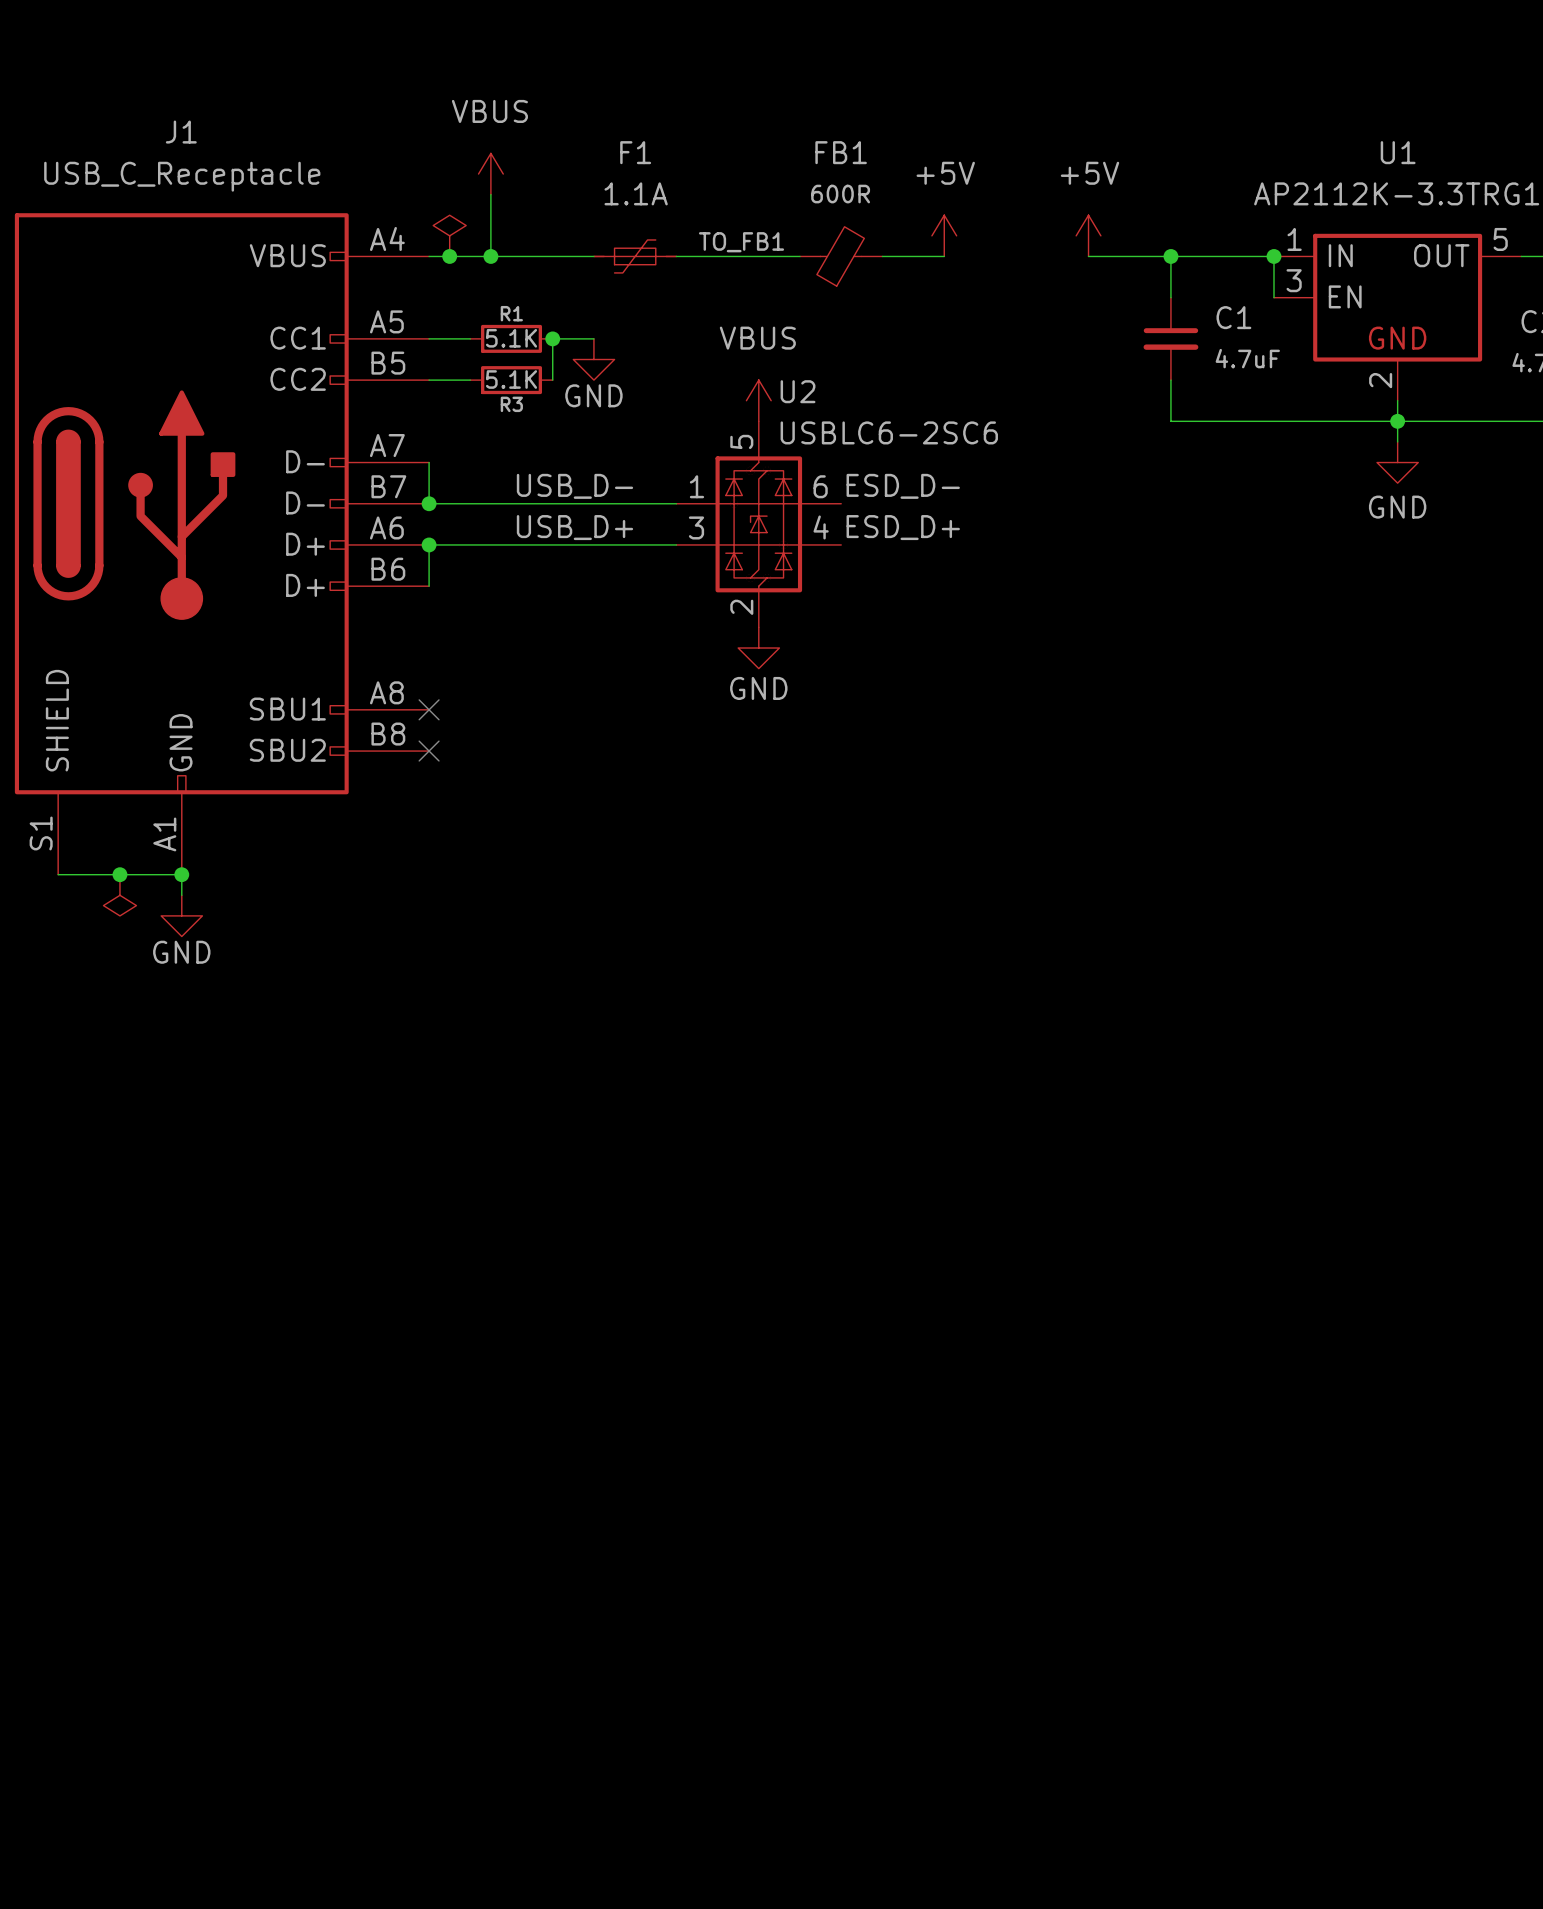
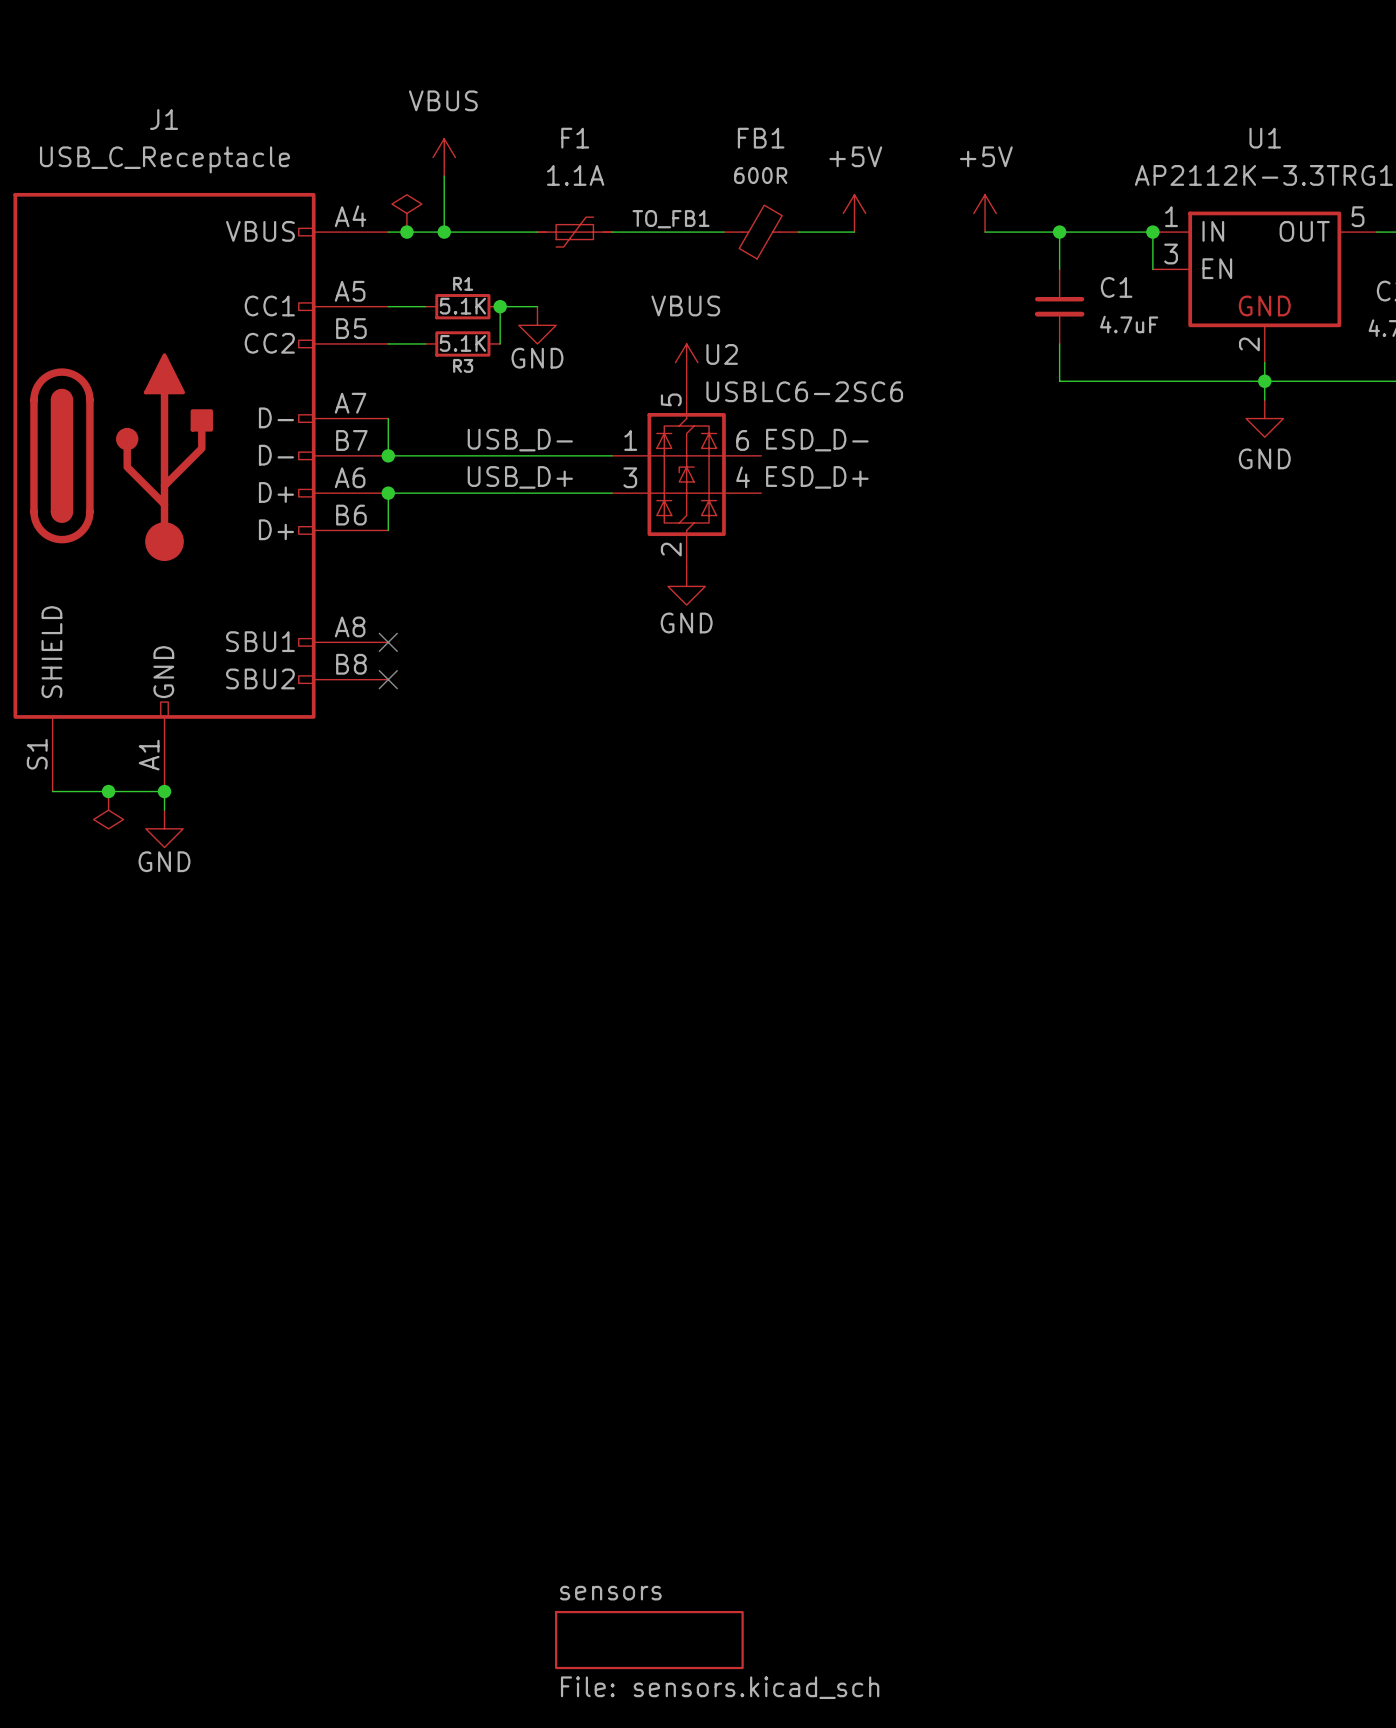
sheet sensors: none -> File: sensors.kicad_sch (649, 1640)

